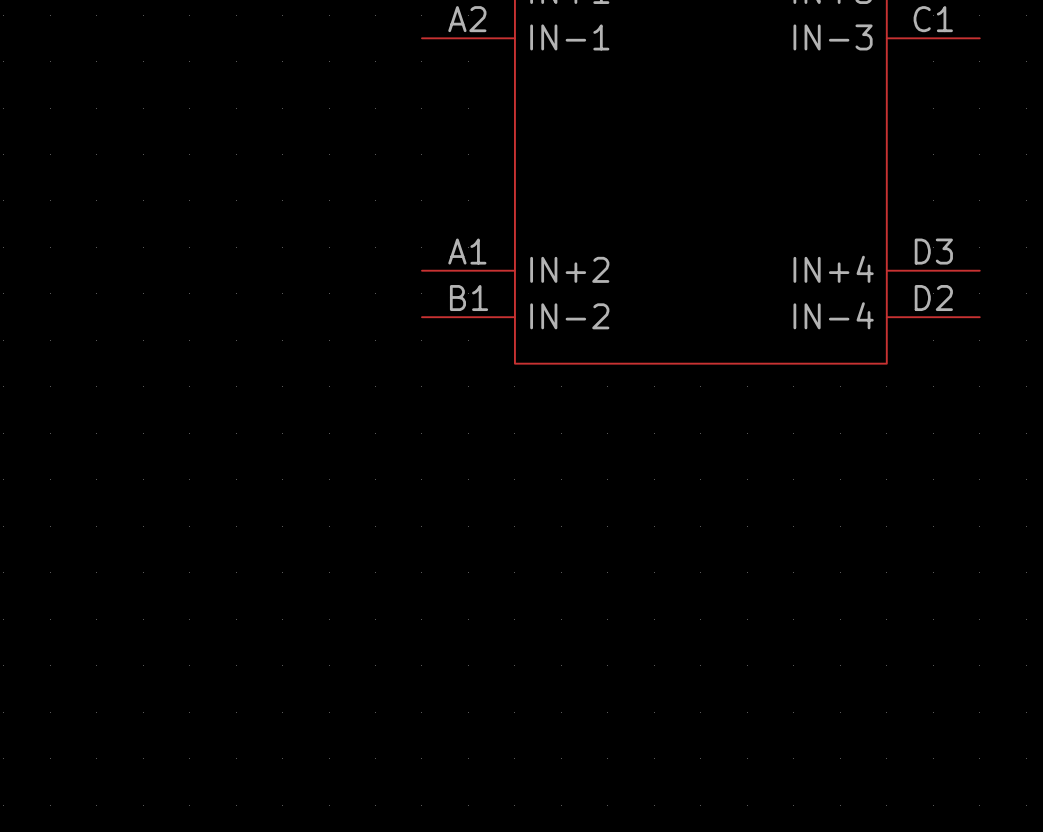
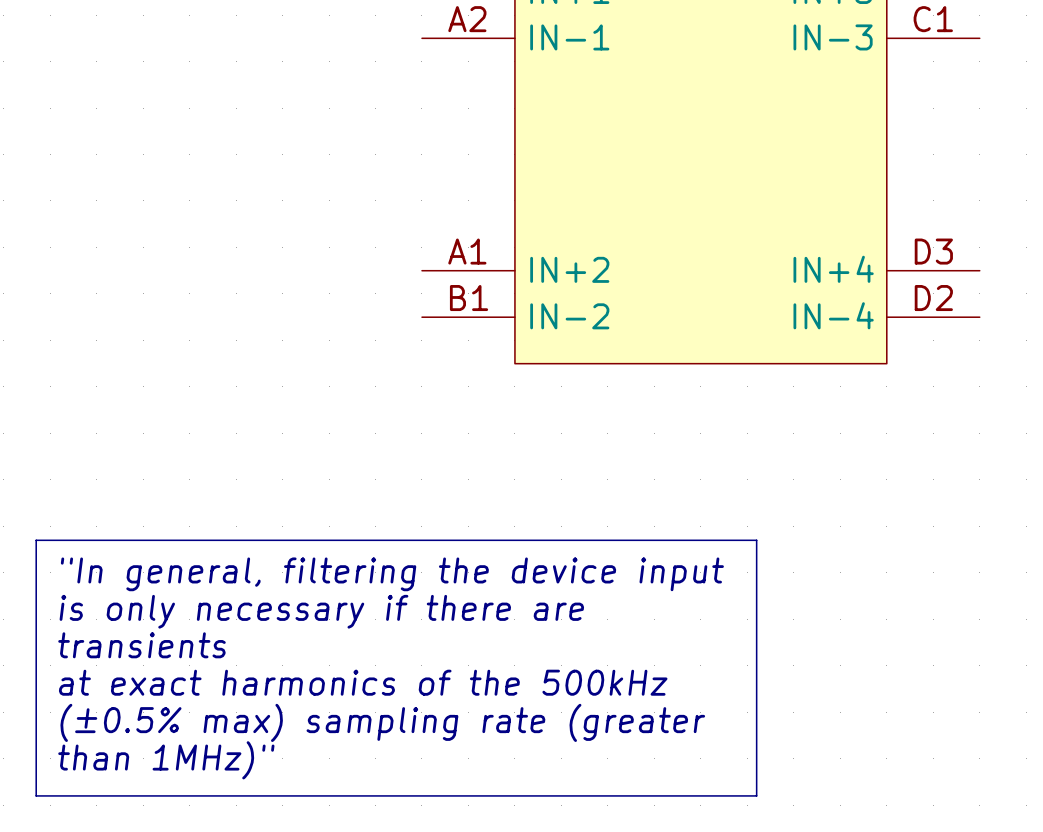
line: none -> (36, 540) (756, 540) (756, 795) (36, 795) (36, 540)
text: none -> "In general, filtering the device input (392, 574)
text: none -> is only necessary if there are (321, 611)
text: none -> transients (142, 645)
text: none -> at exact harmonics of the 500kHz (363, 682)
text: none -> (±0.5% max) sampling rate (greater (382, 722)
text: none -> than 1MHz)" (166, 760)

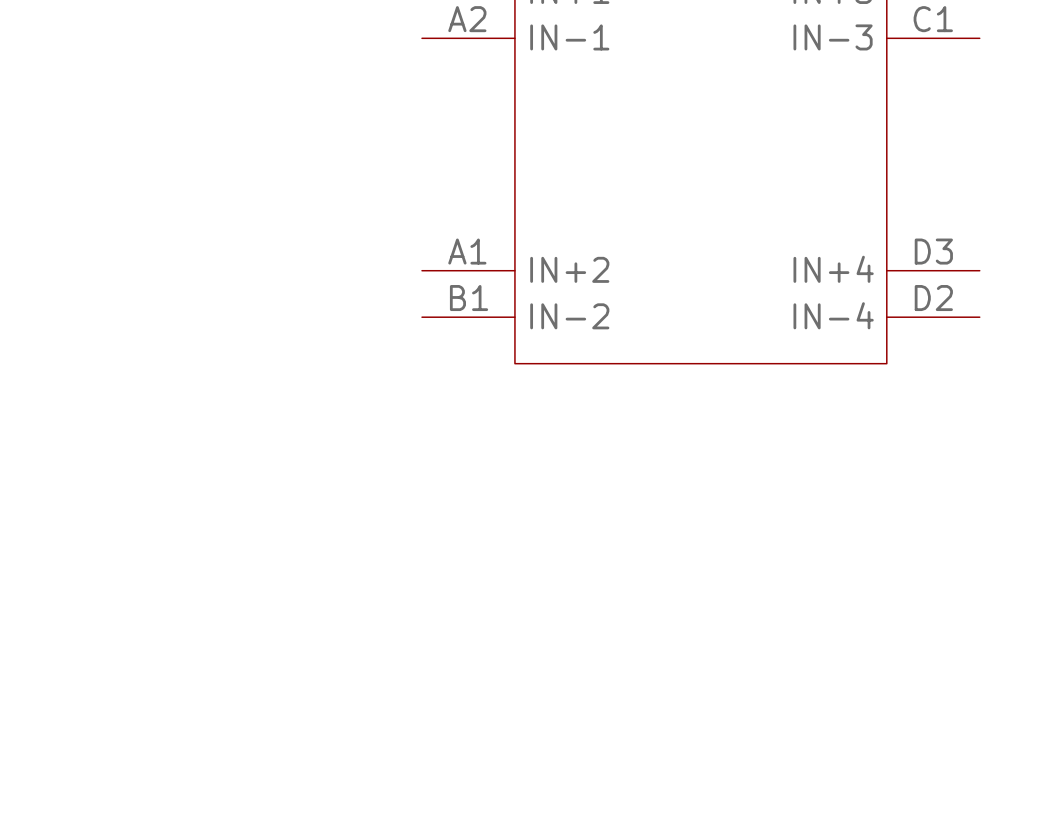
line: (36, 540) (756, 540) (756, 795) (36, 795) (36, 540) -> none
text: "In general, filtering the device input (392, 574) -> none
text: is only necessary if there are (321, 611) -> none
text: transients (142, 645) -> none
text: at exact harmonics of the 500kHz (363, 682) -> none
text: (±0.5% max) sampling rate (greater (382, 722) -> none
text: than 1MHz)" (166, 760) -> none

